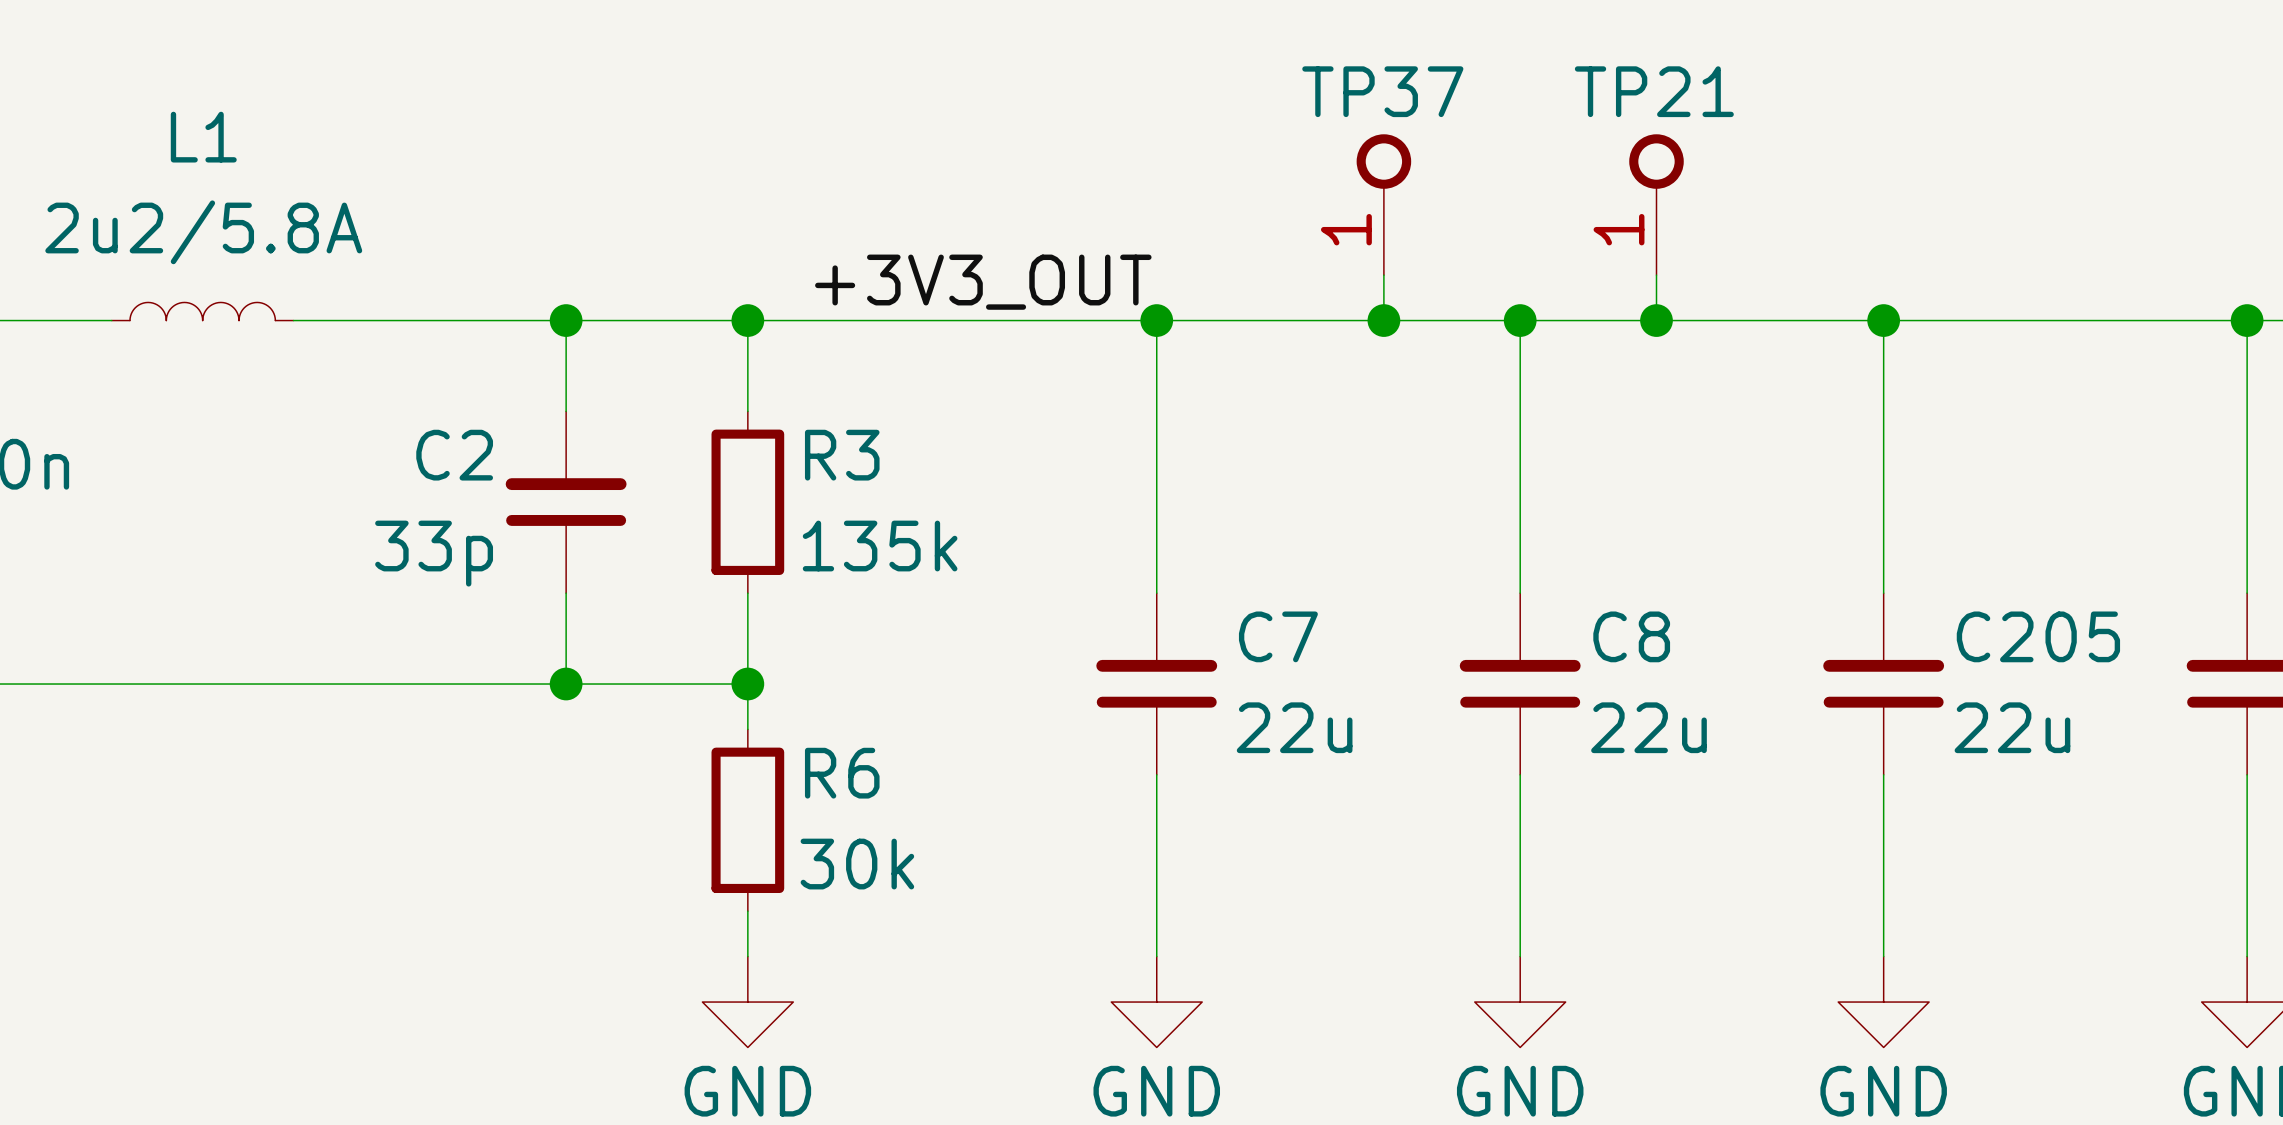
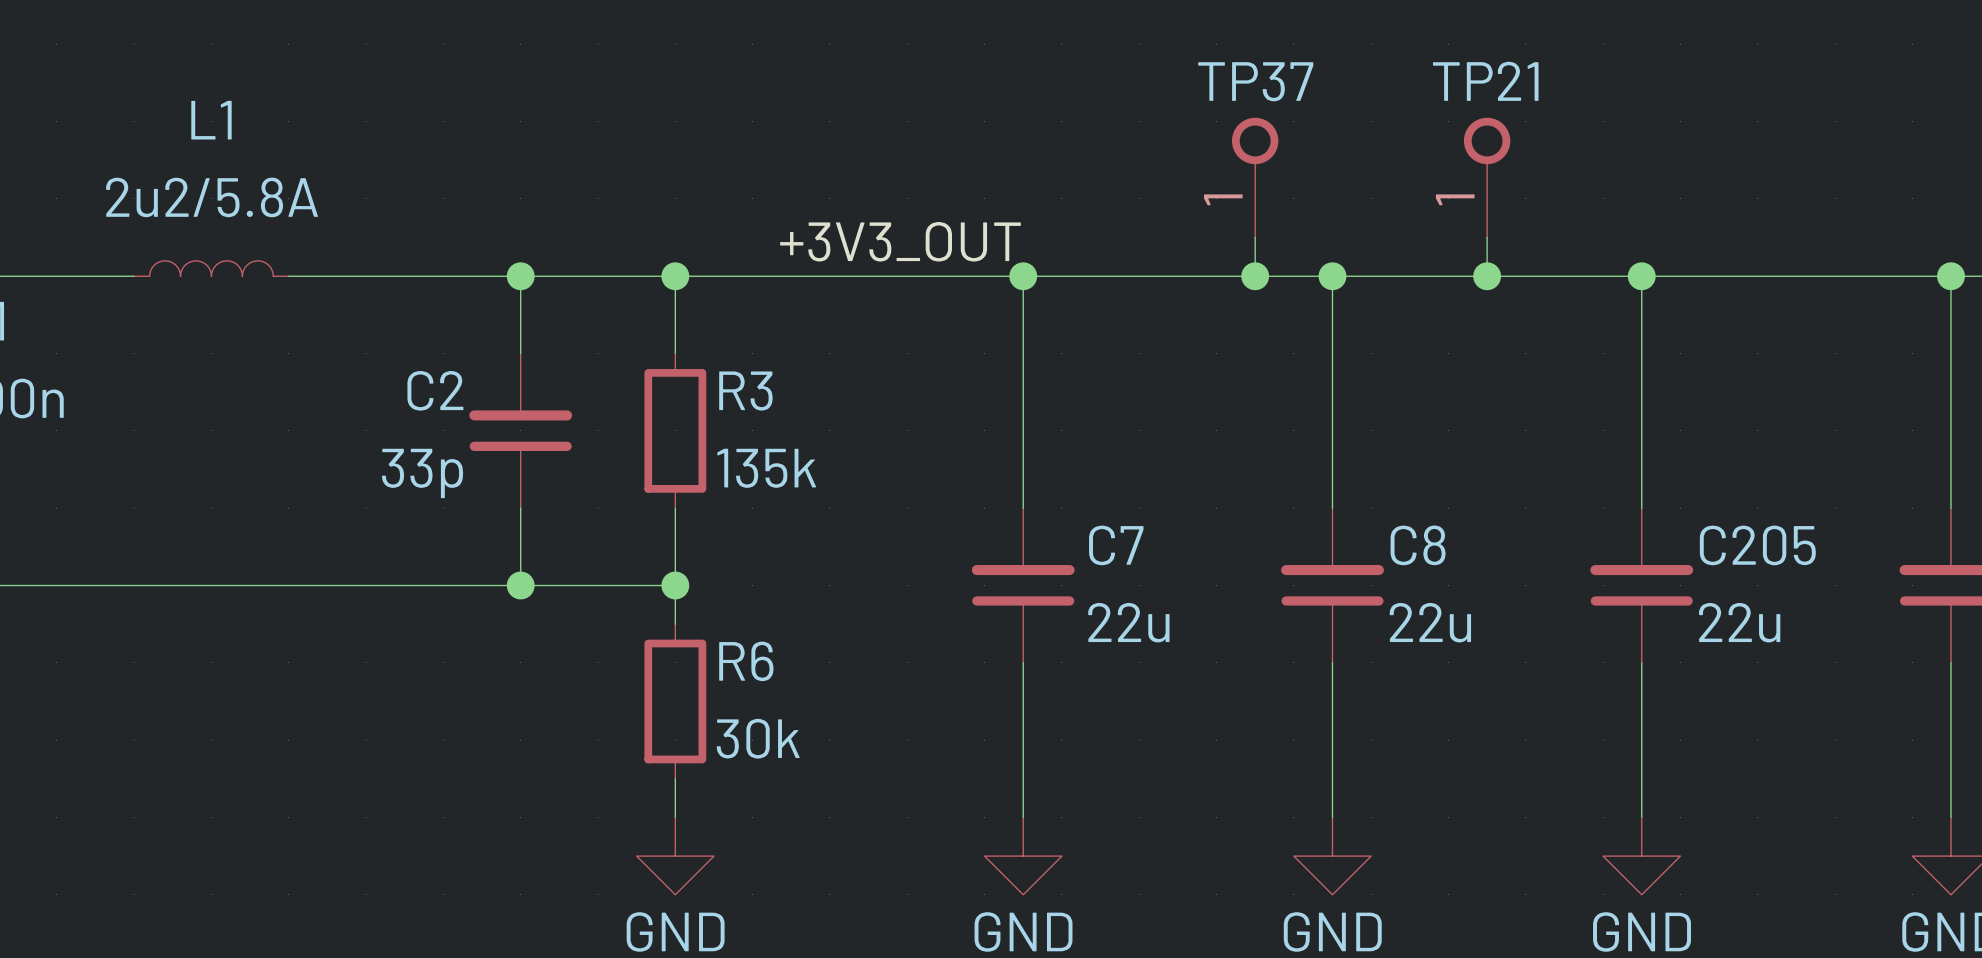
TP37 position: (1383, 204) -> (1255, 177)
TP21 position: (1656, 204) -> (1487, 177)
wire: (1383, 275) (1383, 320) -> (1255, 237) (1255, 276)
wire: (1656, 275) (1656, 320) -> (1487, 237) (1487, 276)
junction position: (1383, 320) -> (1255, 276)
junction position: (1656, 320) -> (1487, 276)

